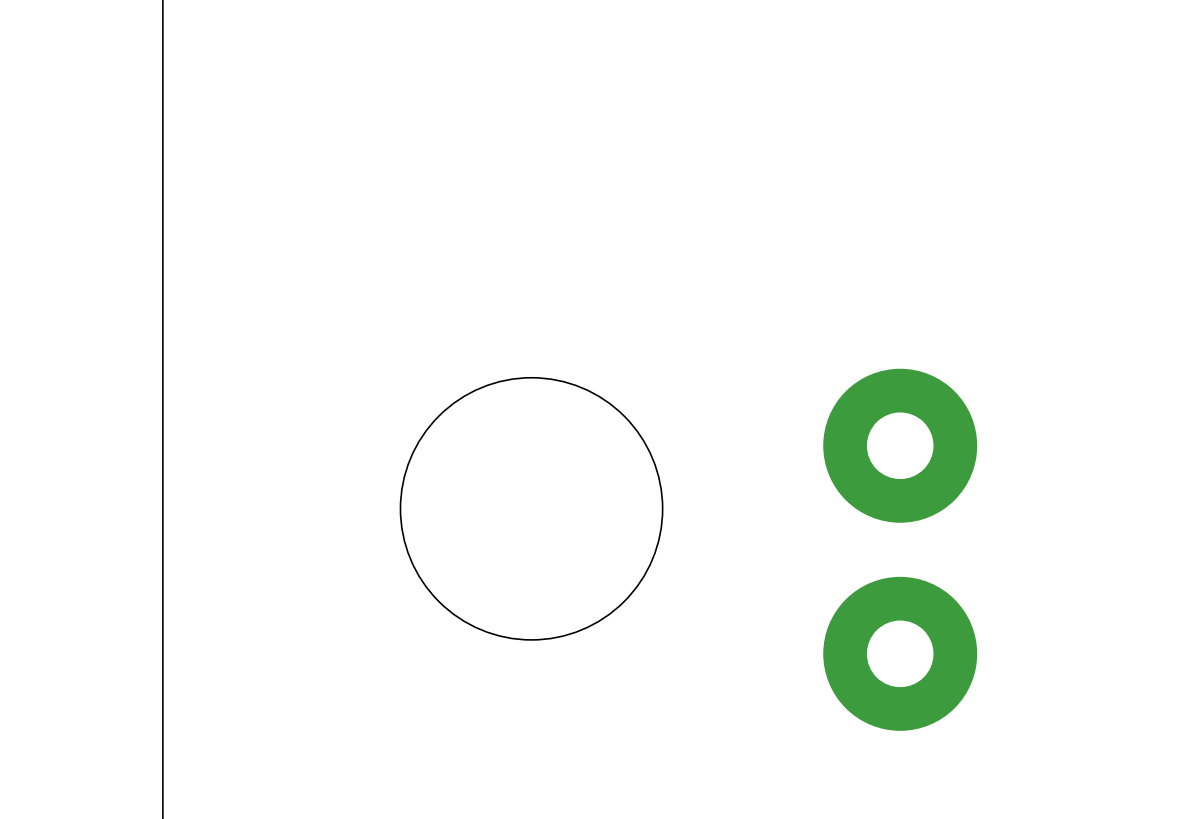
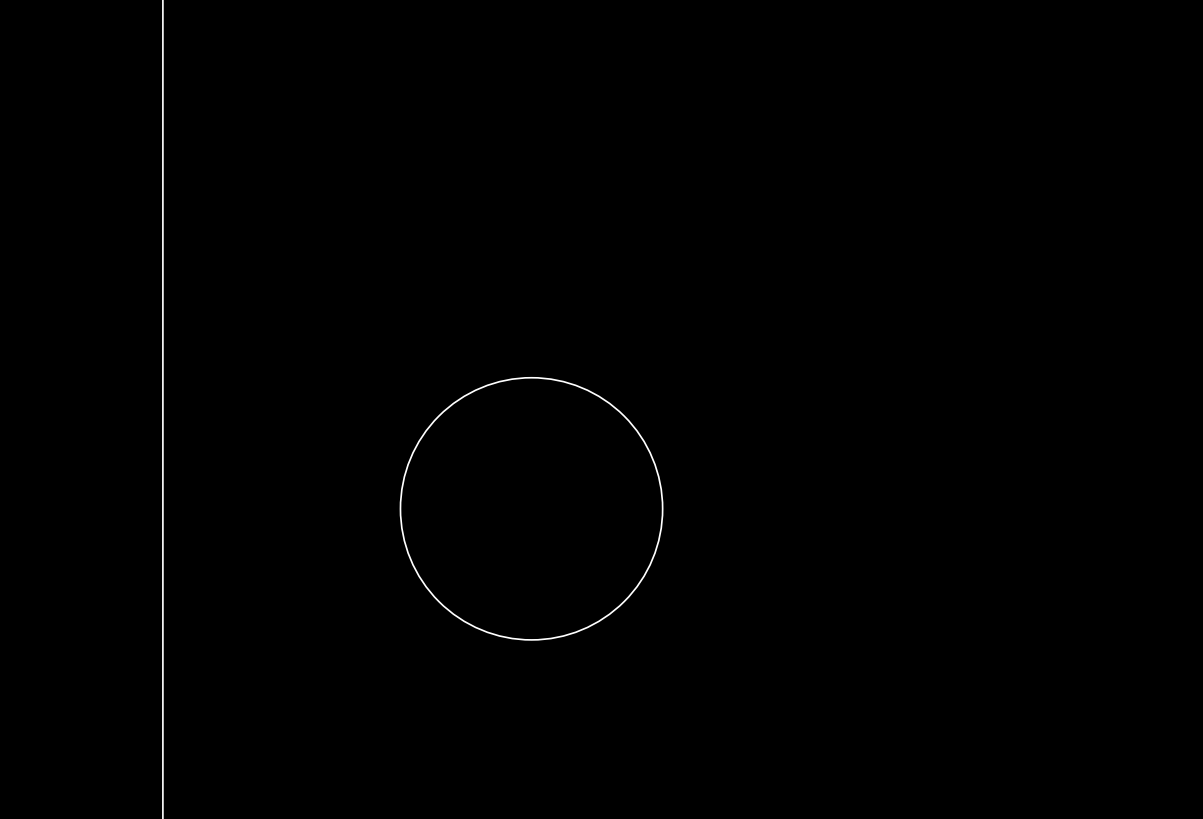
part: (900, 549) -> none

